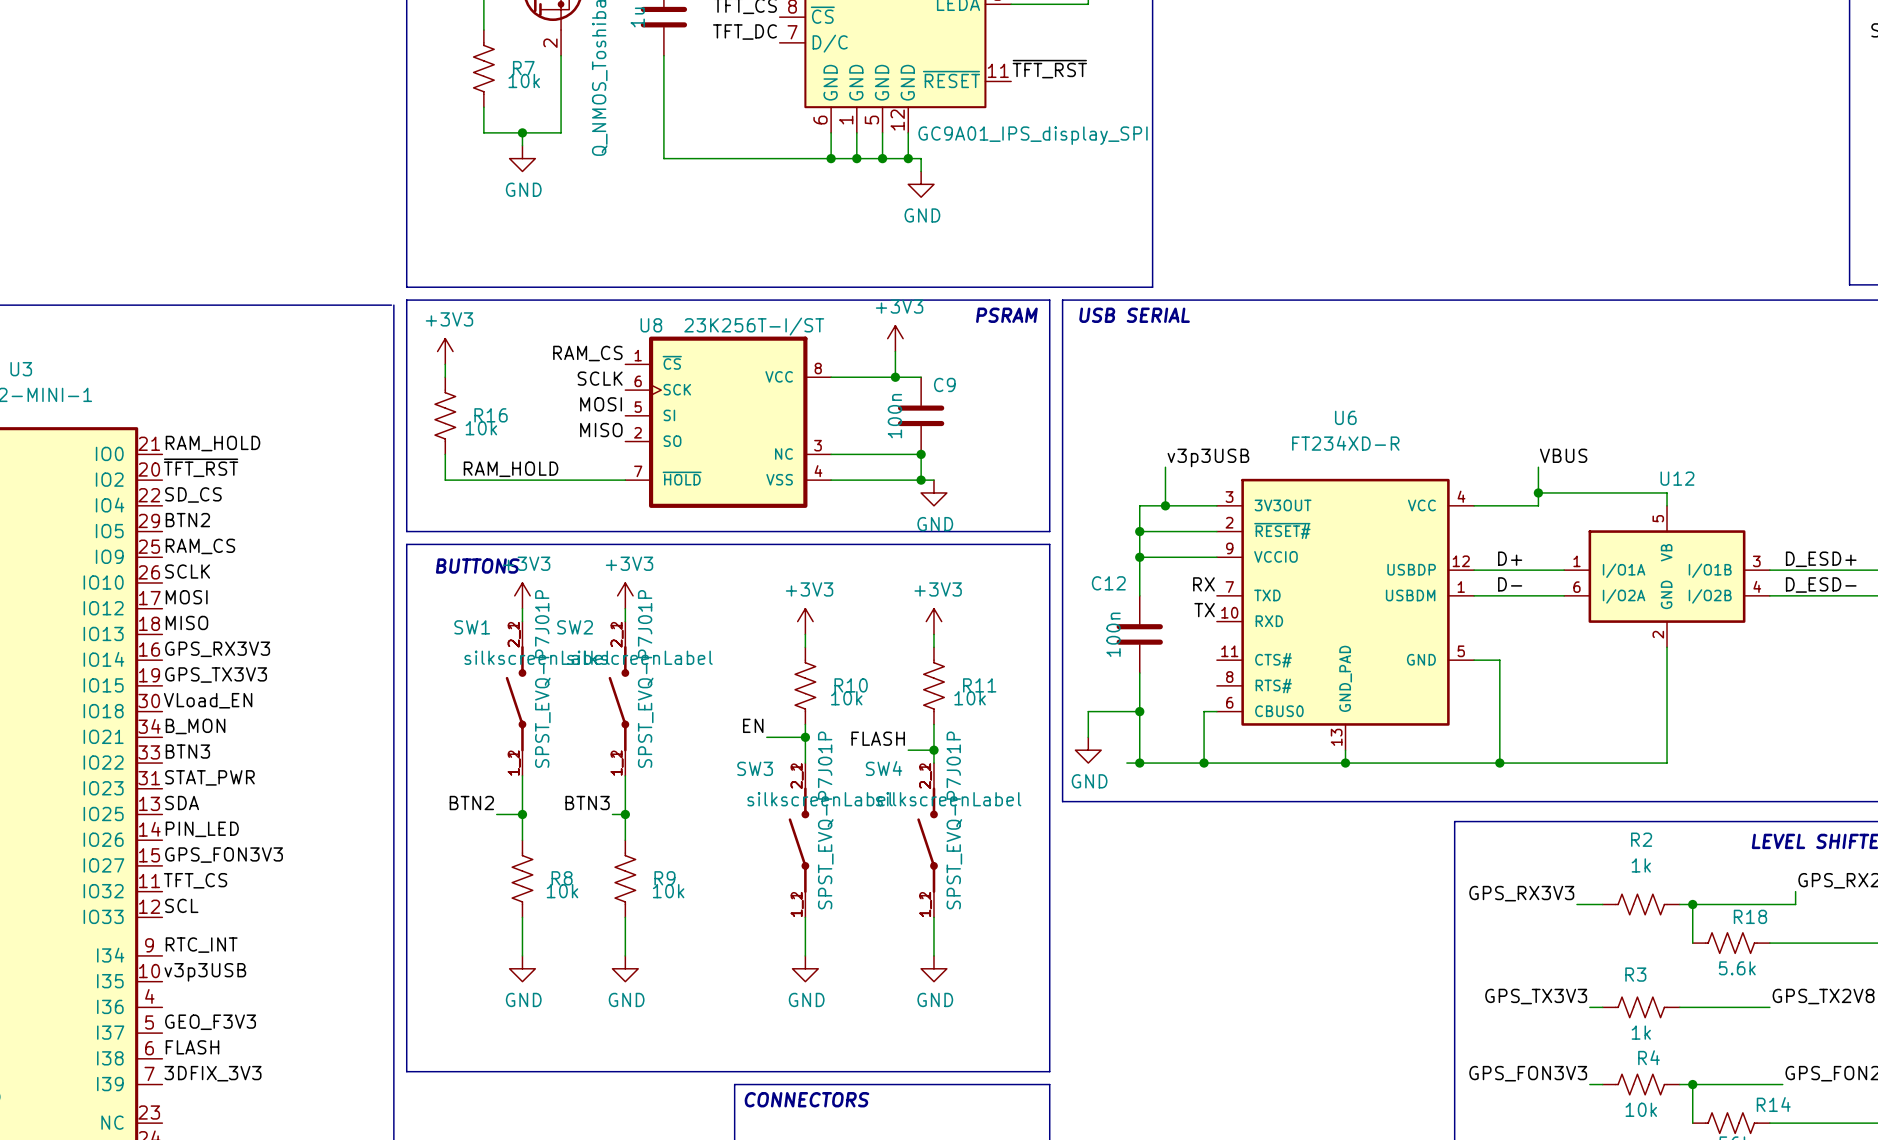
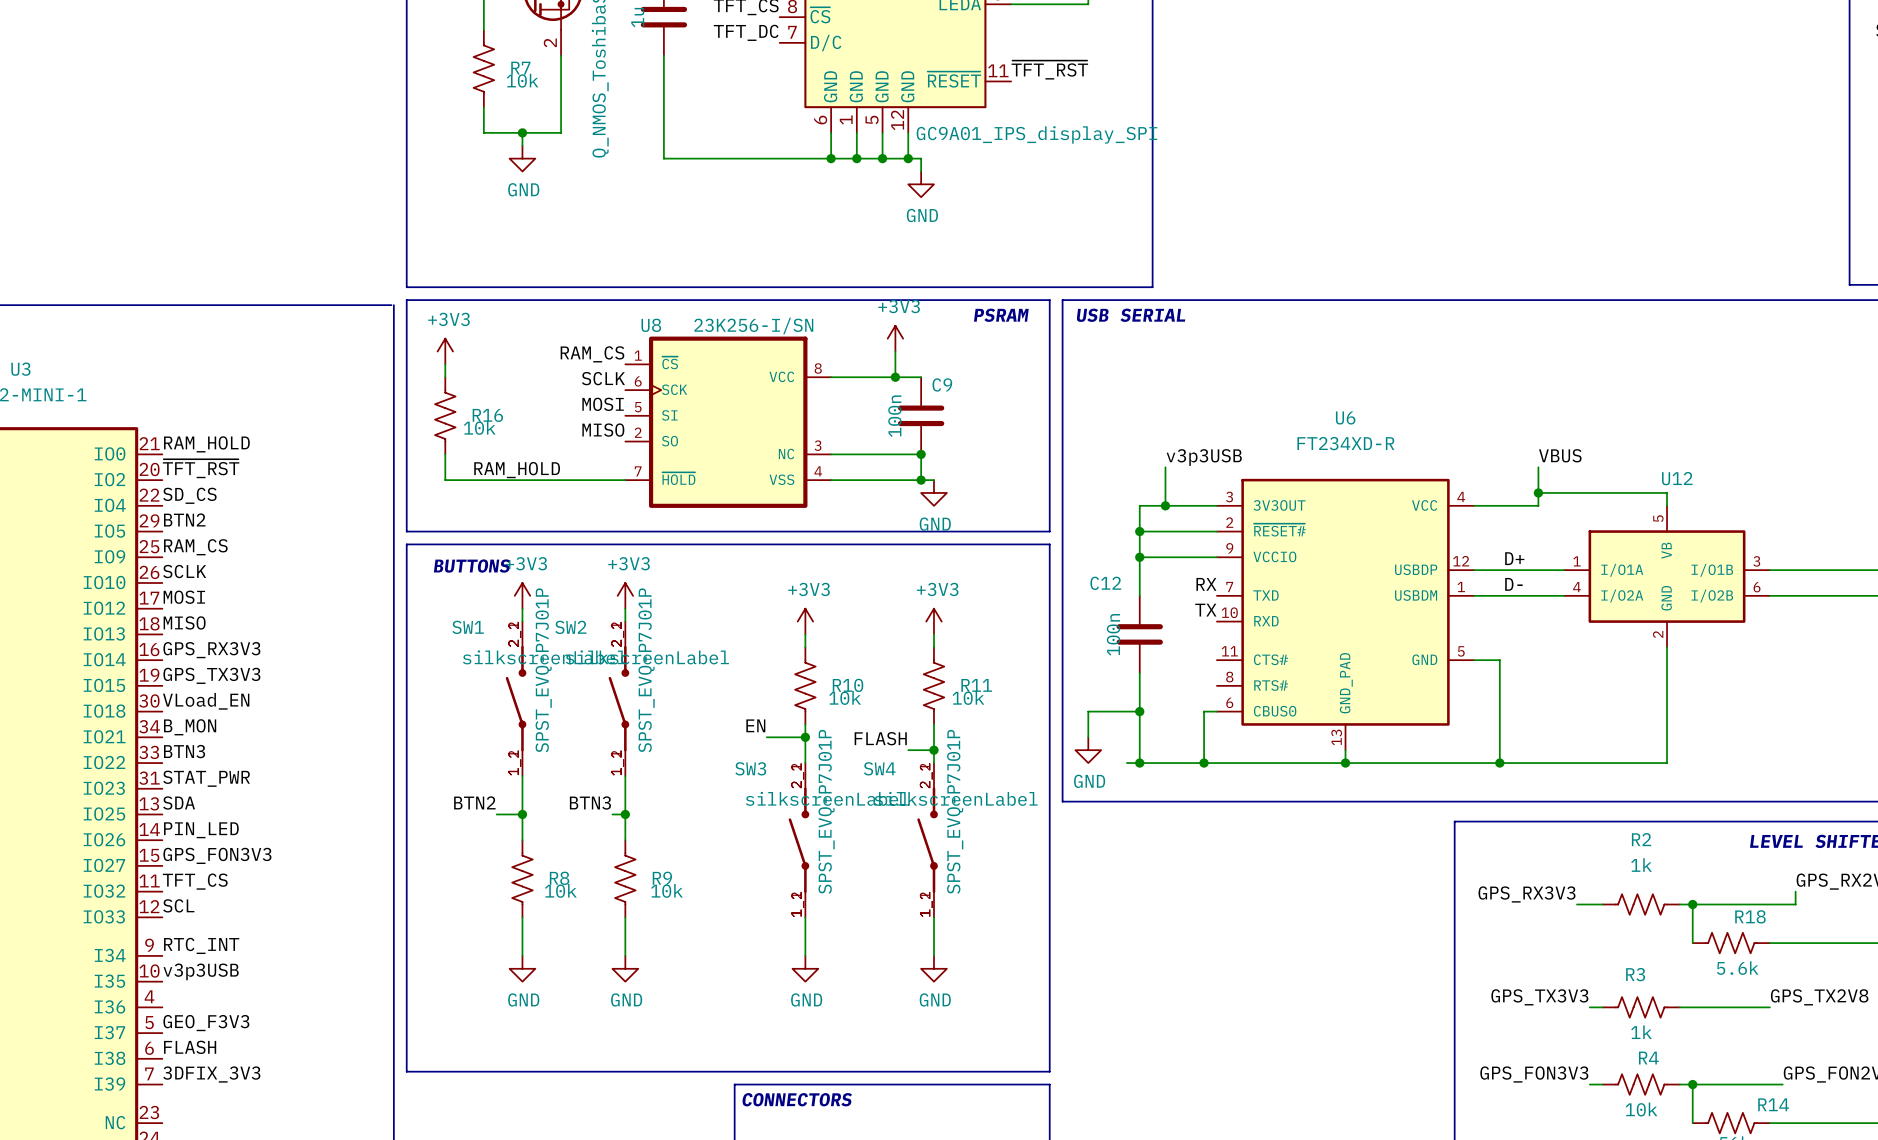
U8 value: 23K256T-I/ST (754, 326) -> 23K256-I/SN (753, 326)
label: D_ESD+ (1821, 559) -> none
label: D_ESD- (1821, 584) -> none
U12 pin number: 4 (1757, 586) -> 6 (1757, 587)
U12 pin number: 6 (1576, 587) -> 4 (1576, 587)

